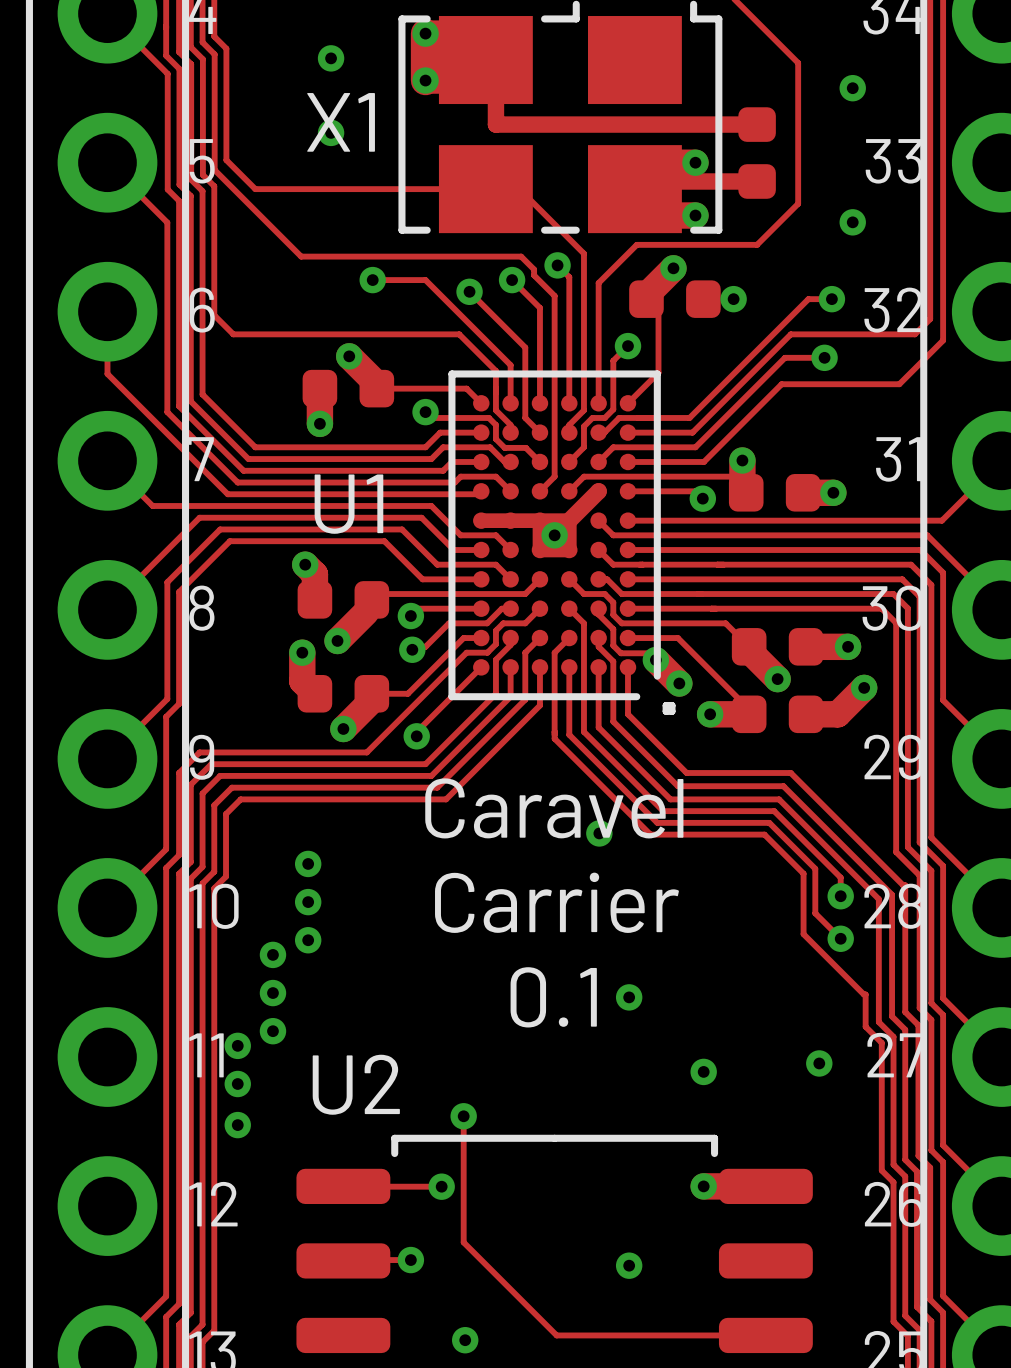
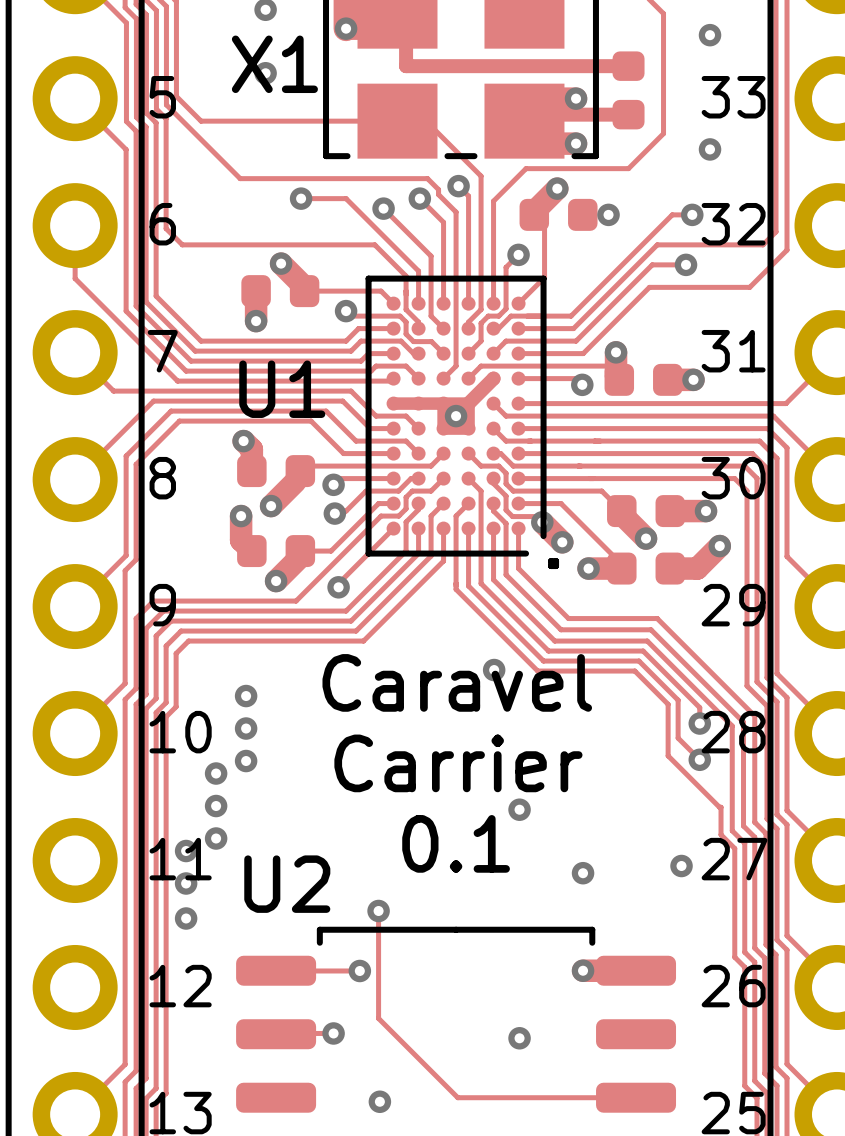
text position: Caravel (554, 808) -> Caravel (457, 682)
text position: Carrier (557, 902) -> Carrier (458, 763)
text position: 0.1 (553, 997) -> 0.1 (456, 843)

